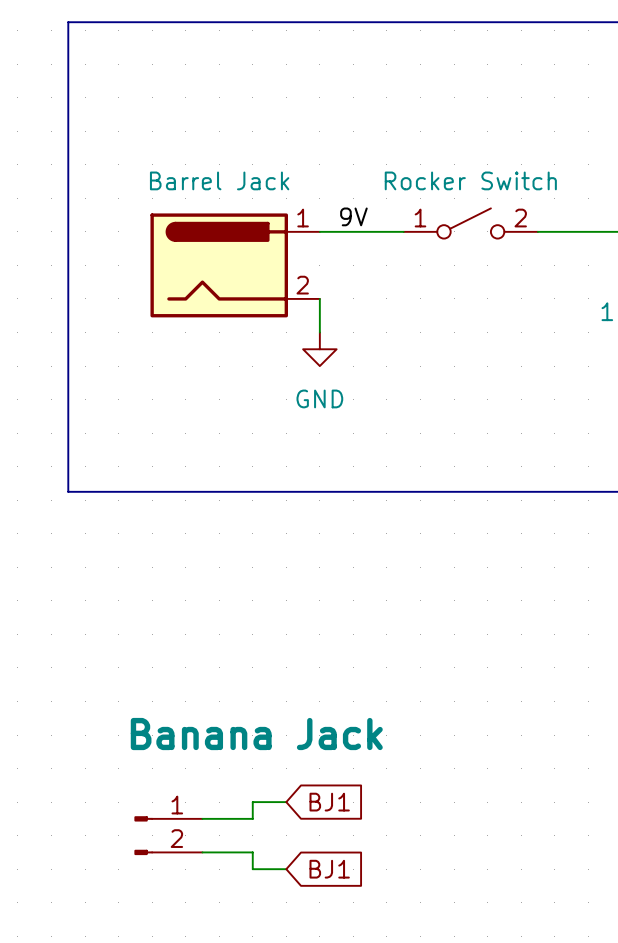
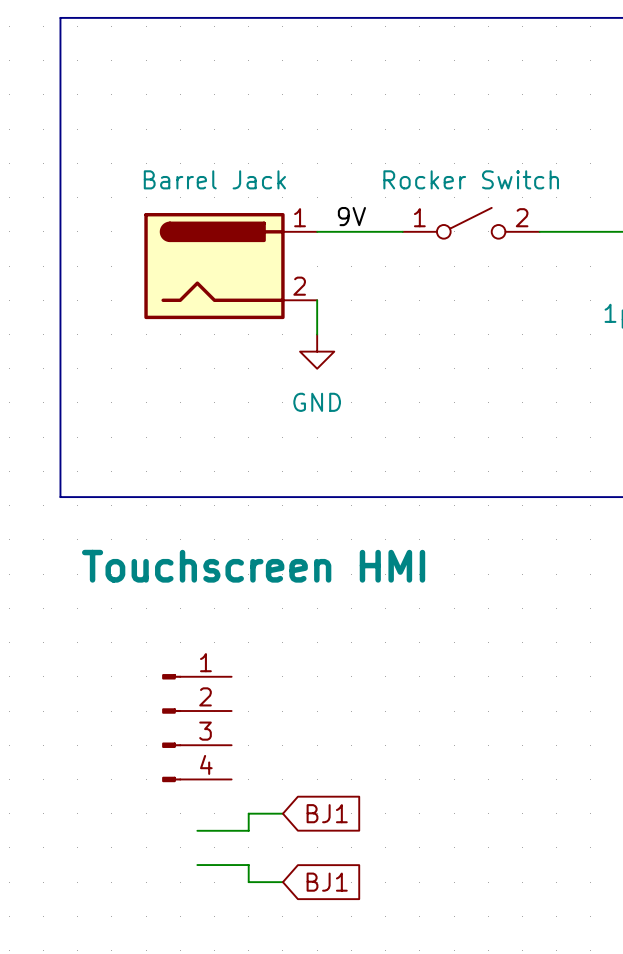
part: none -> Touchscreen HMI (196, 728)
part: Banana Jack (168, 835) -> none

